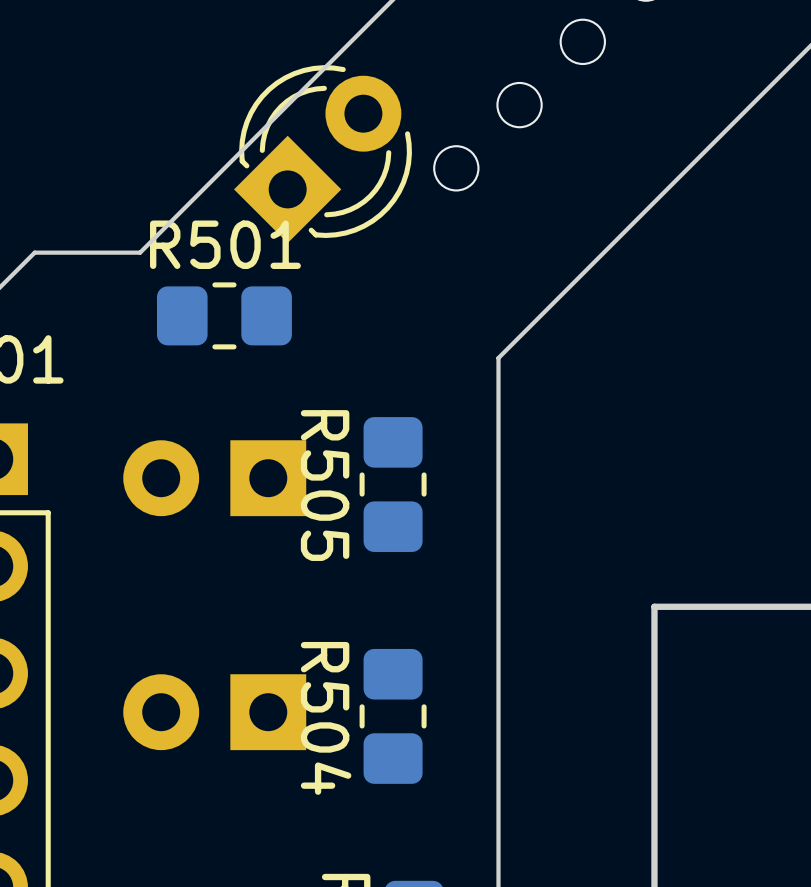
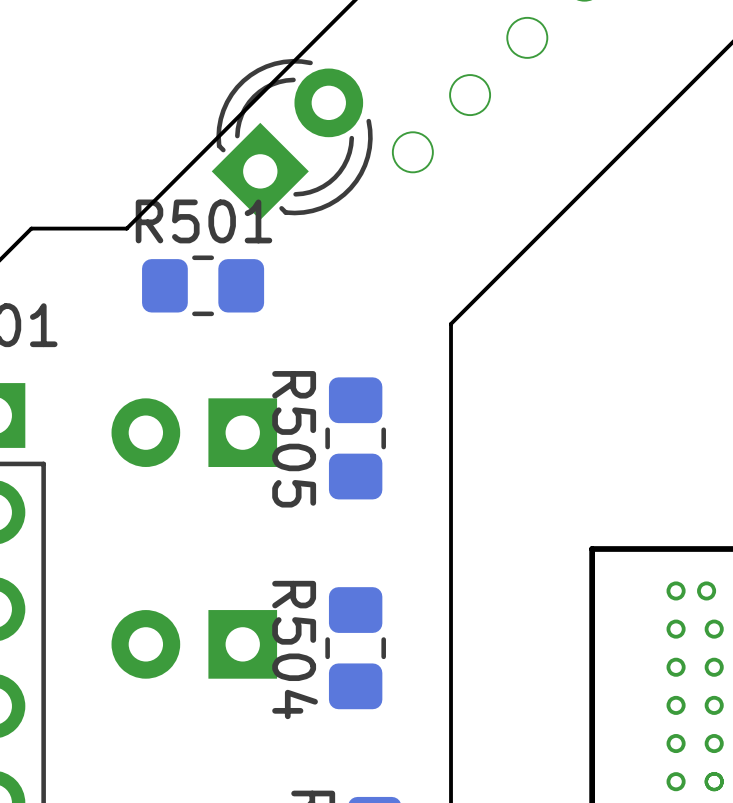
via: none -> (676, 590)
via: none -> (706, 590)
via: none -> (676, 629)
via: none -> (714, 629)
via: none -> (676, 667)
via: none -> (714, 667)
via: none -> (676, 705)
via: none -> (714, 705)
via: none -> (676, 743)
via: none -> (714, 743)
via: none -> (676, 781)
via: none -> (714, 781)

